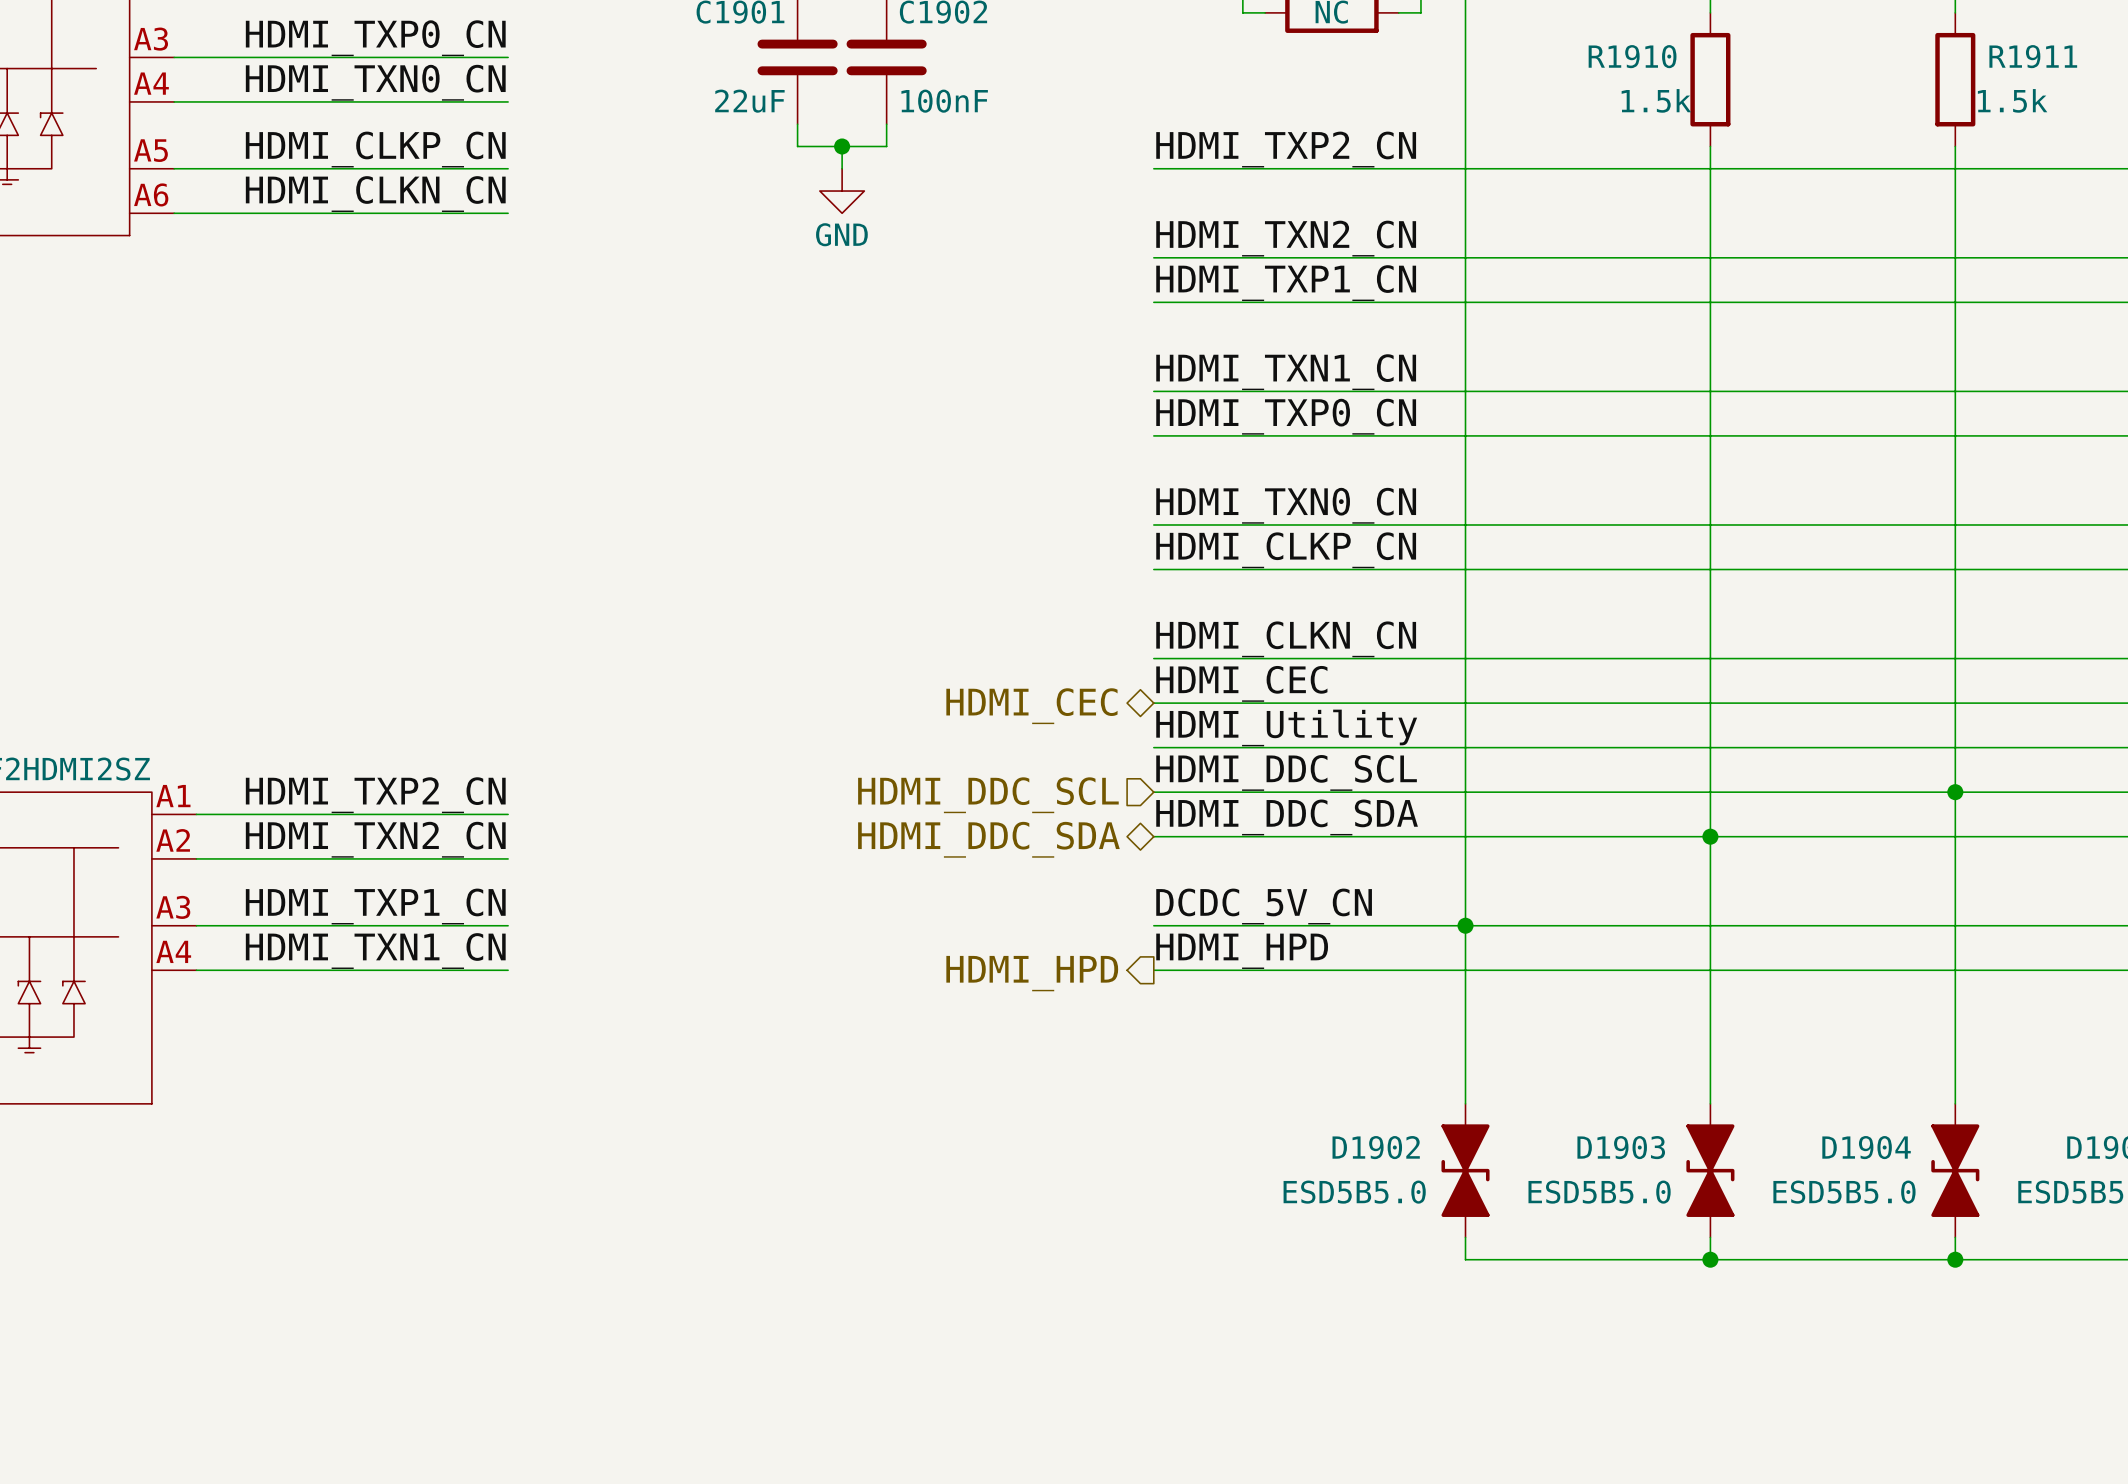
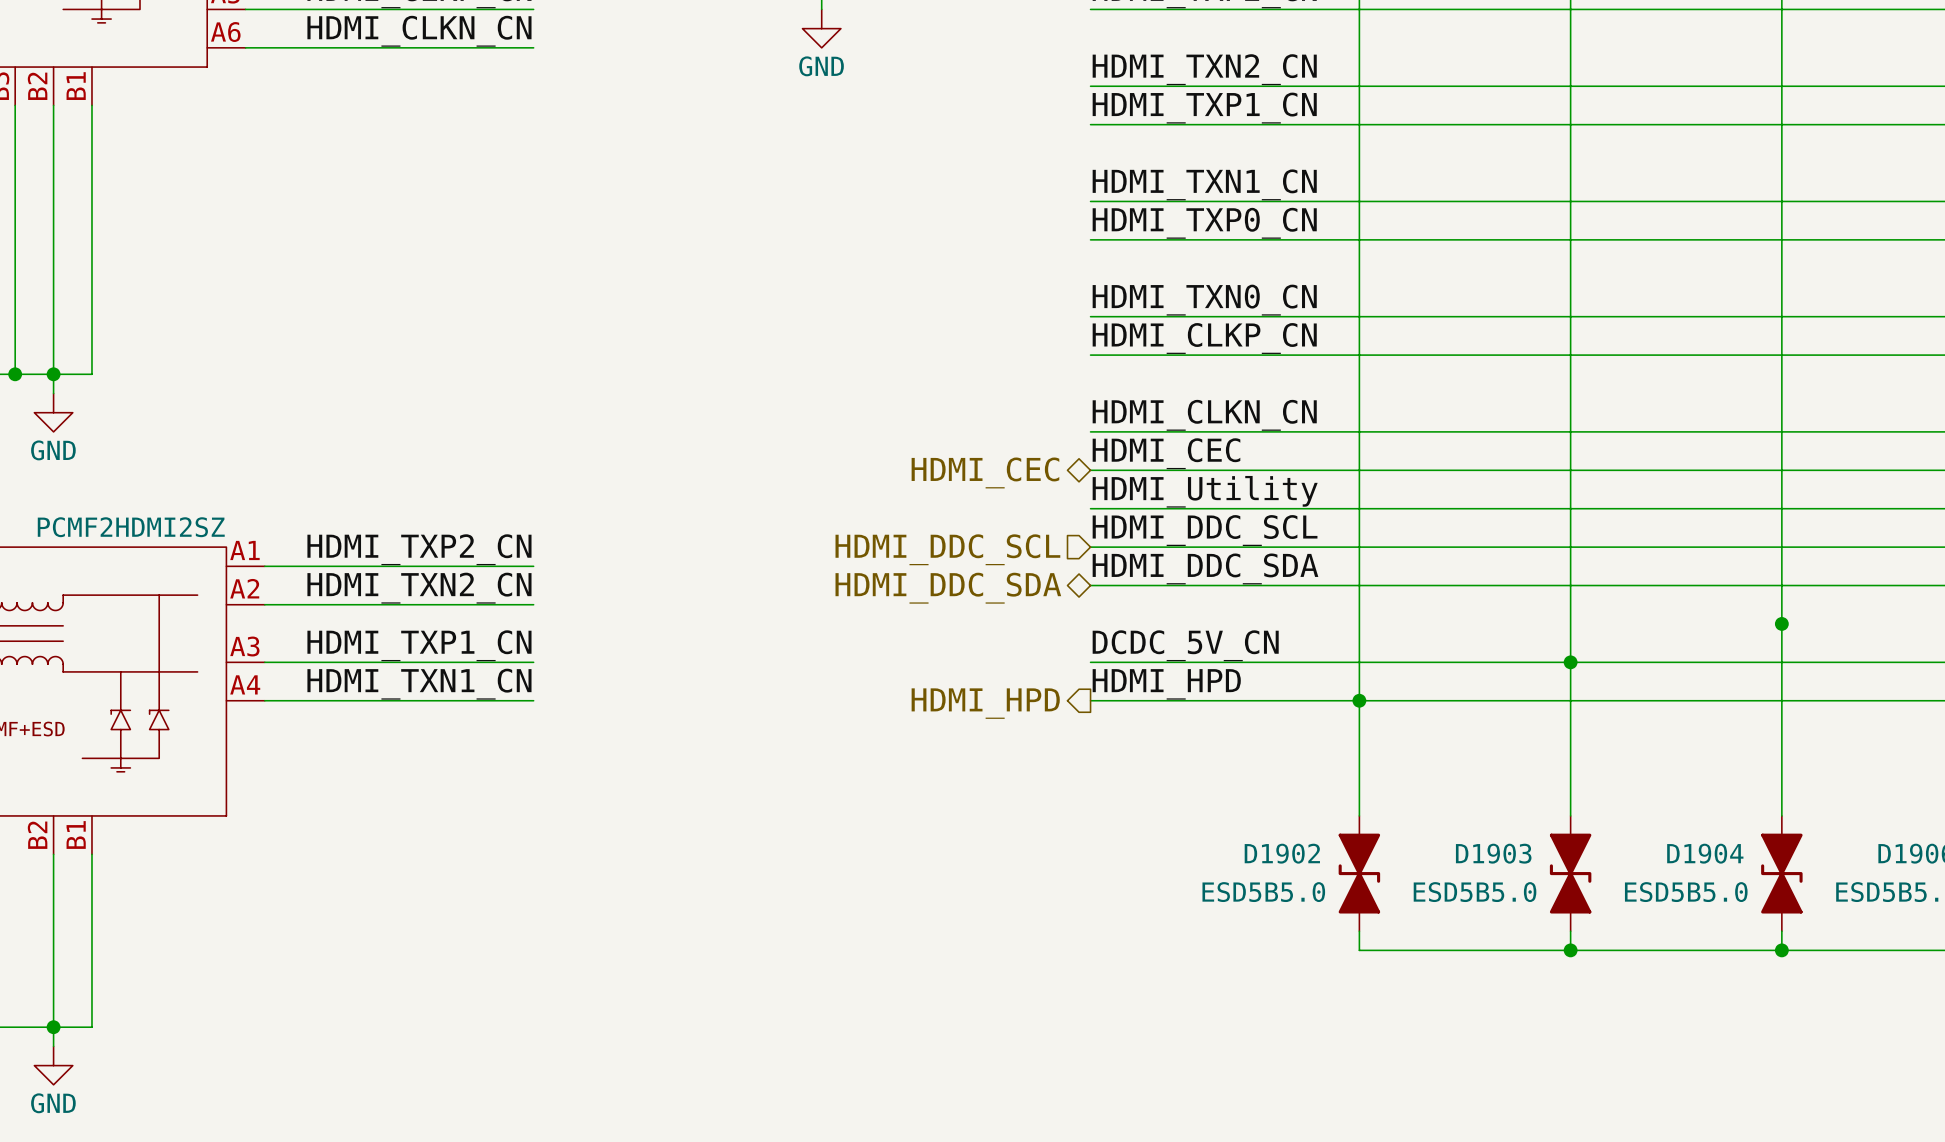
junction position: (1955, 792) -> (1781, 623)
junction position: (1710, 836) -> (1570, 662)
junction position: (1465, 925) -> (1359, 700)

